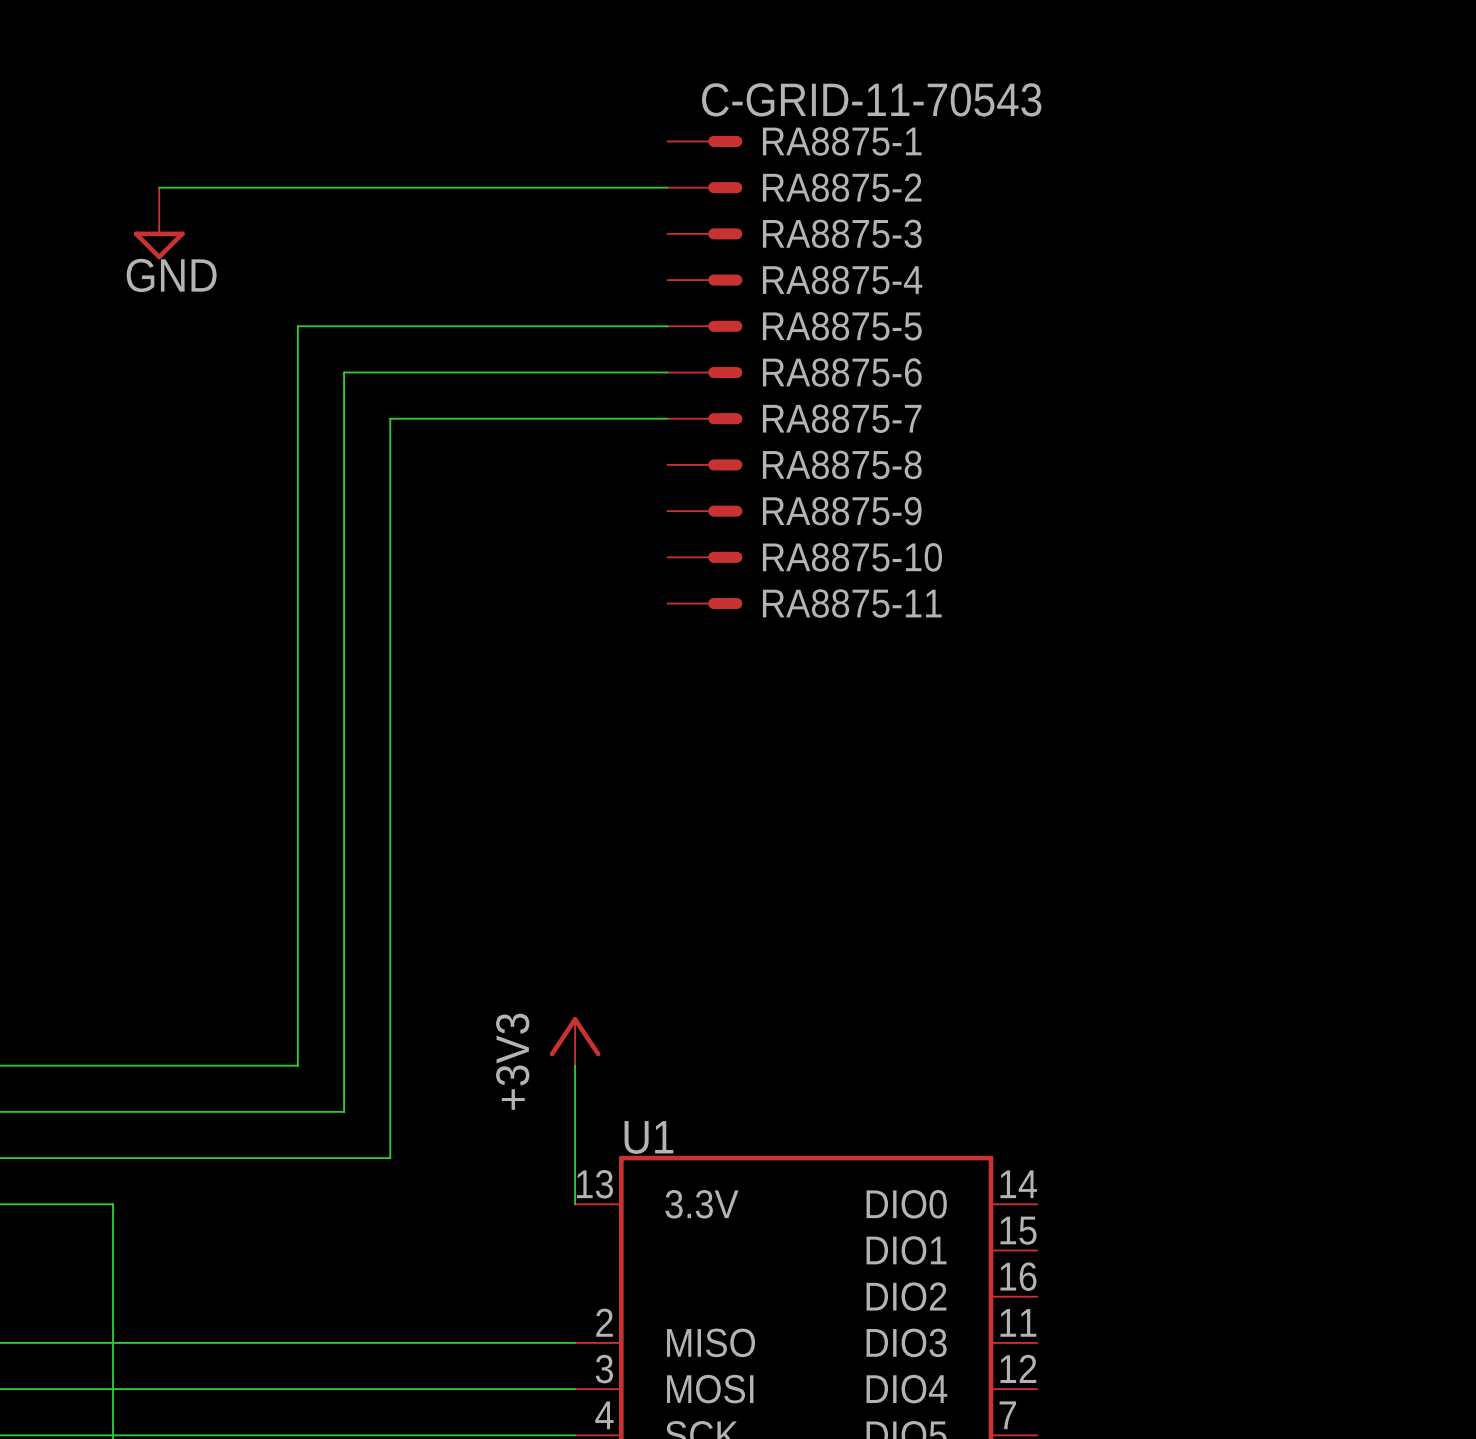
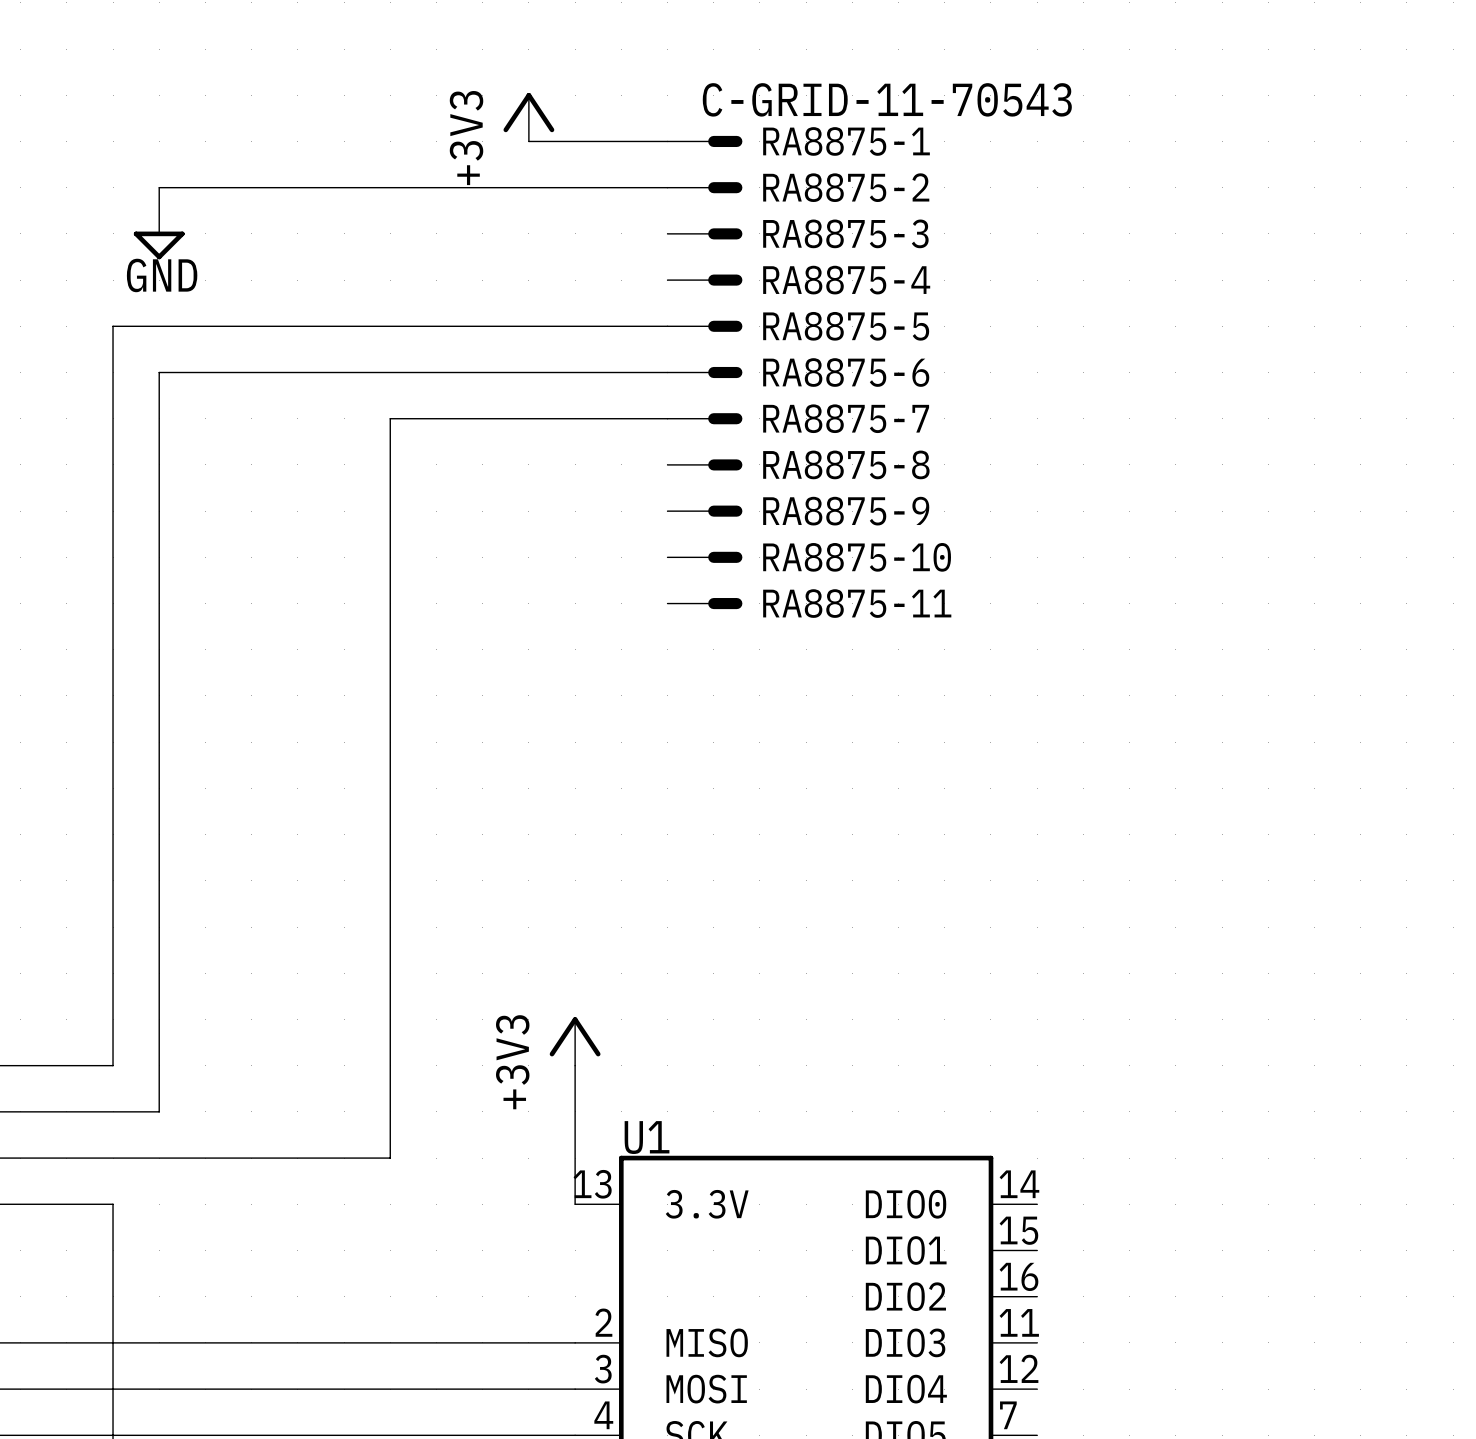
power symbol: none -> +3V3 (528, 117)
wire: none -> (528, 141) (667, 141)
wire: (297, 326) (297, 1065) (113, 1065) -> (297, 326) (113, 326) (113, 1065)
wire: (344, 372) (344, 1111) (159, 1111) -> (344, 372) (159, 372) (159, 1111)

